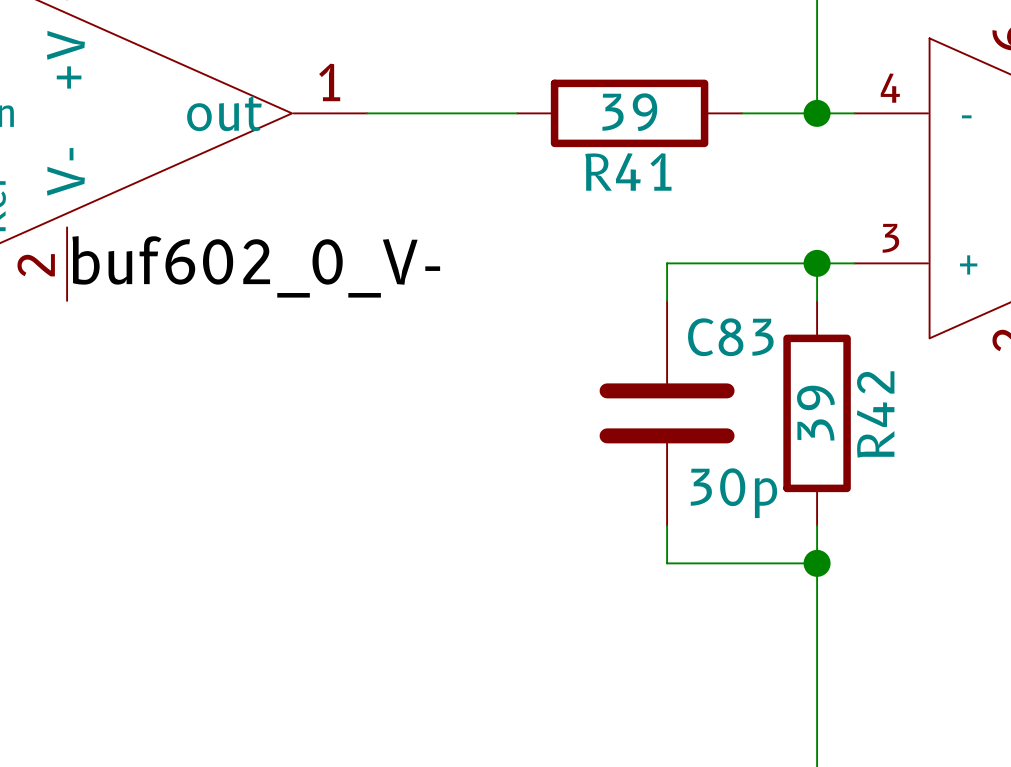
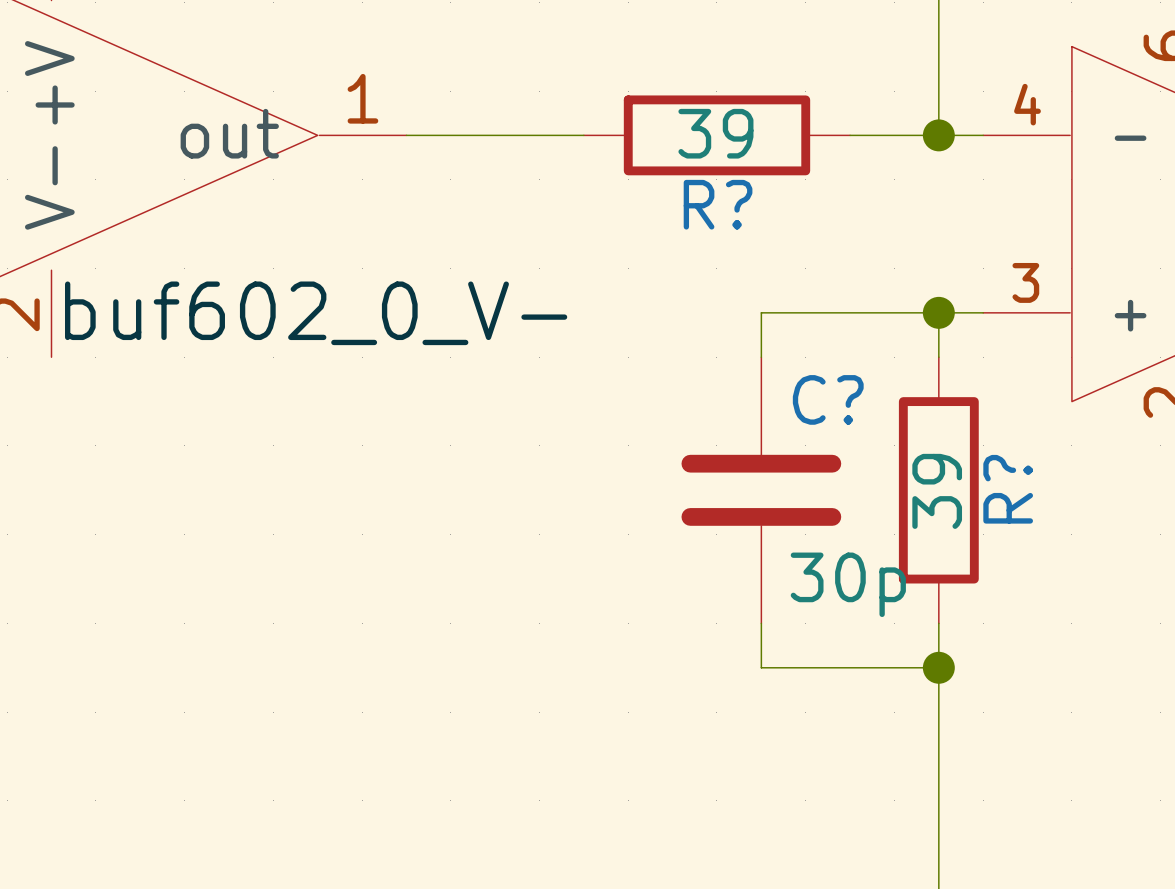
R41 name: R41 (628, 171) -> R? (718, 204)
C83 name: C83 (730, 337) -> C? (828, 399)
R42 name: R42 (875, 414) -> R? (1008, 489)

